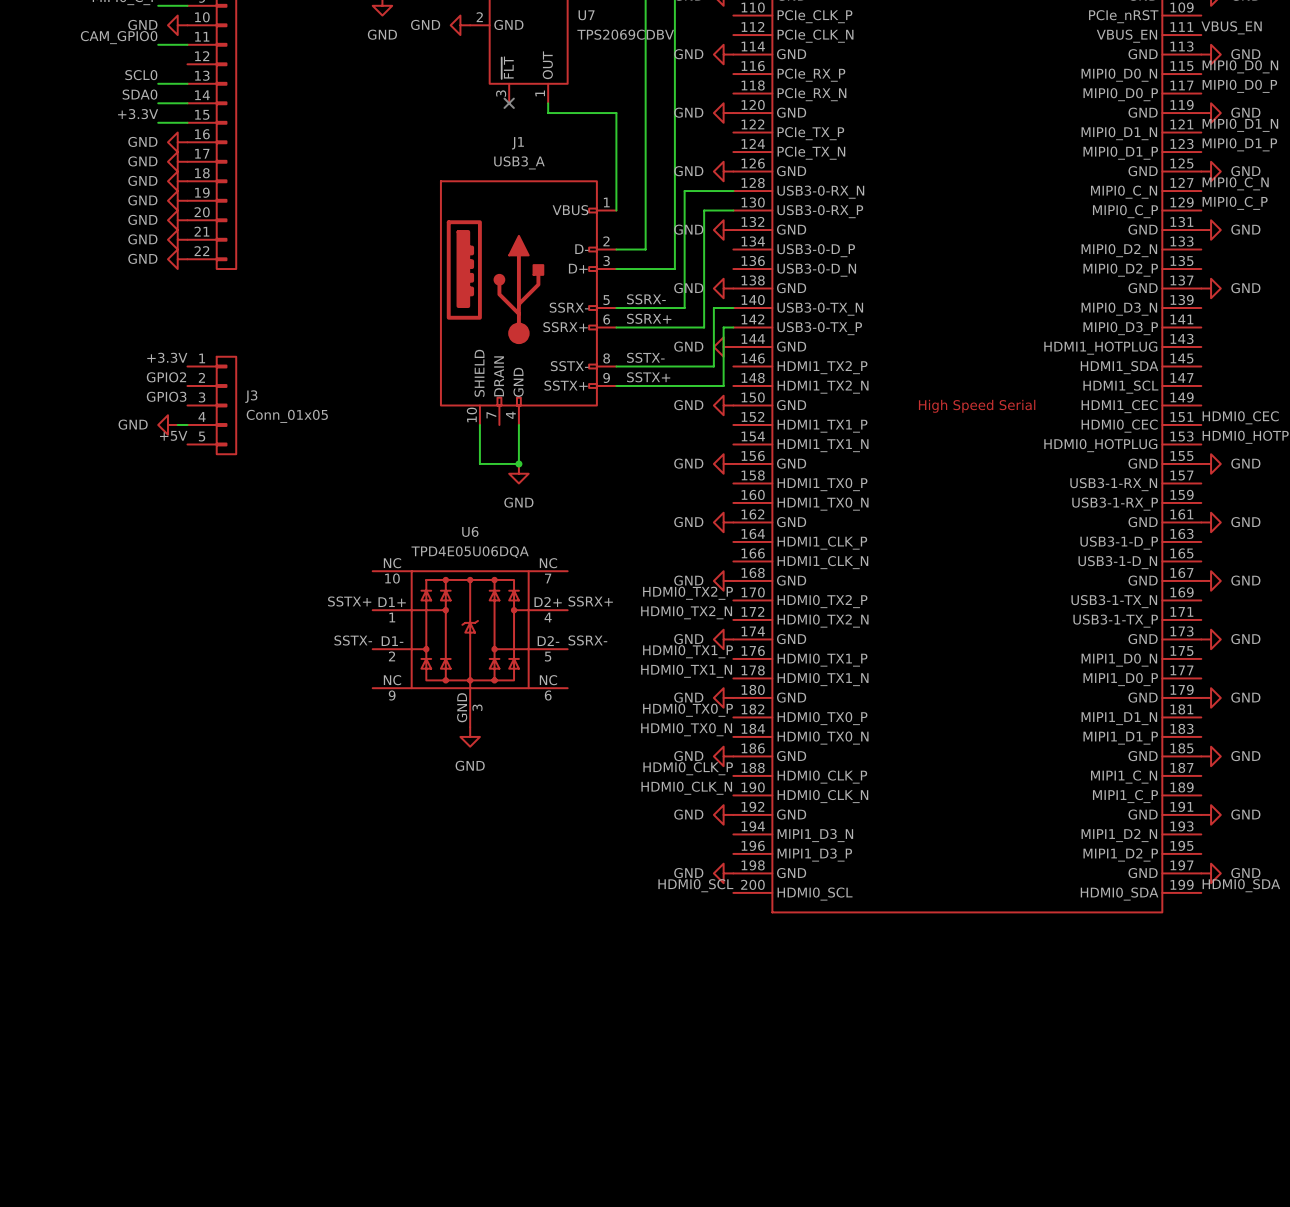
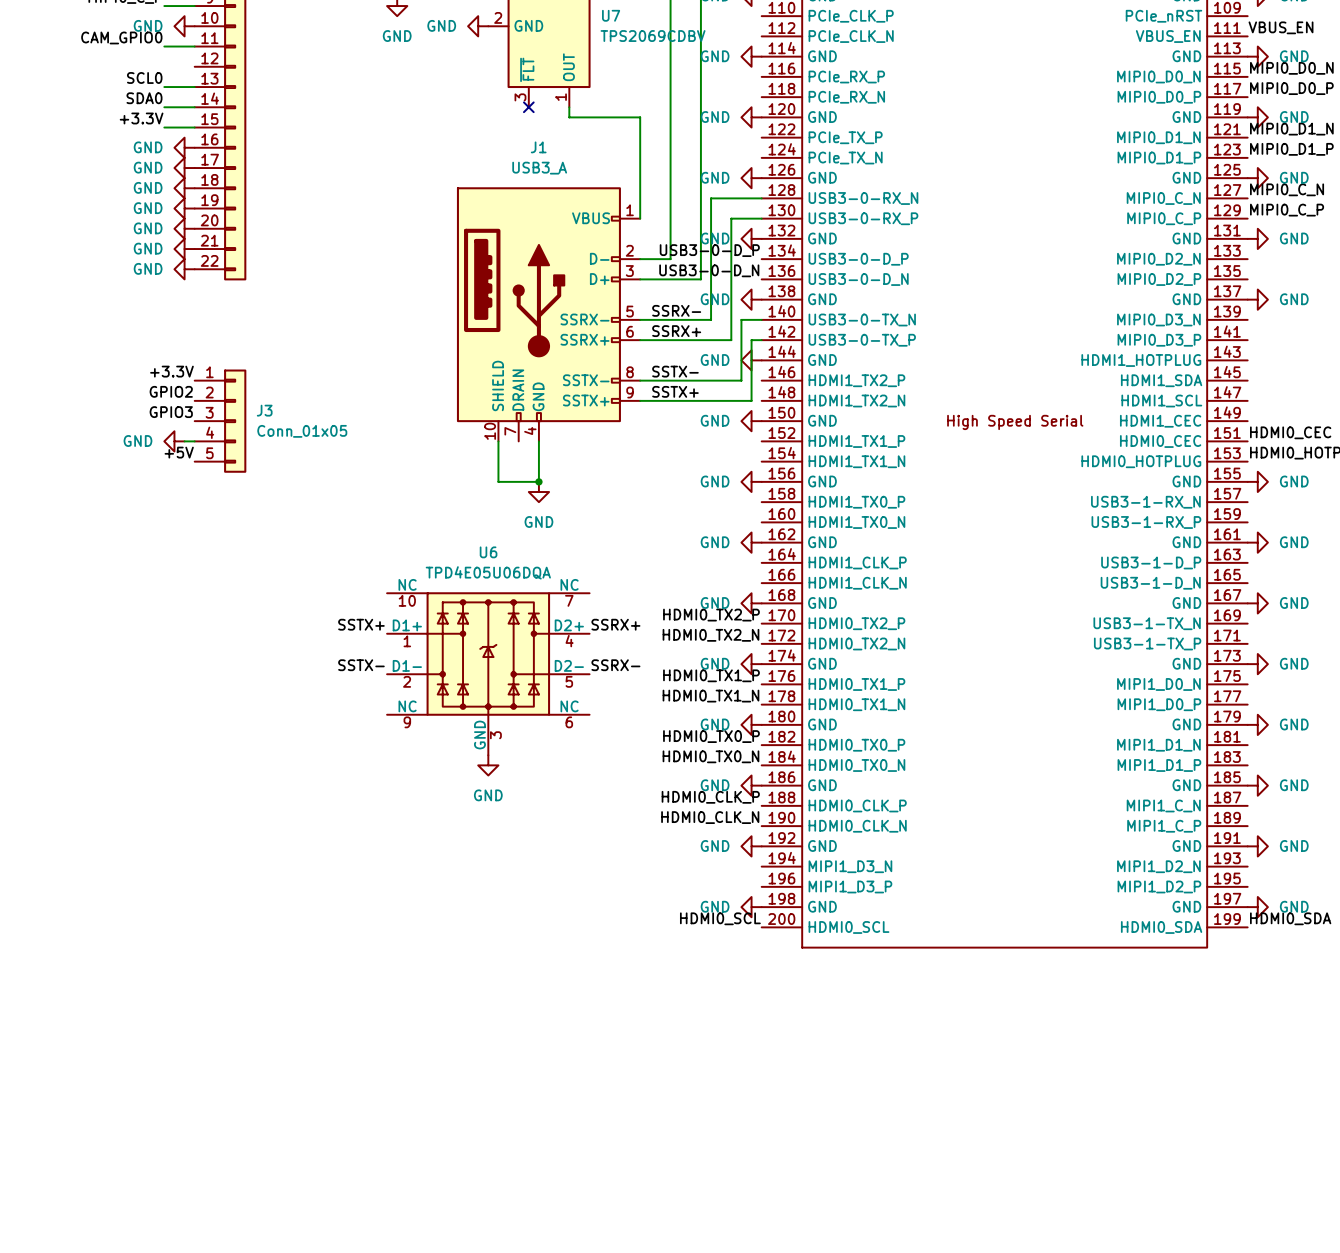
label: none -> USB3-0-D_P (709, 250)
label: none -> USB3-0-D_N (709, 270)

